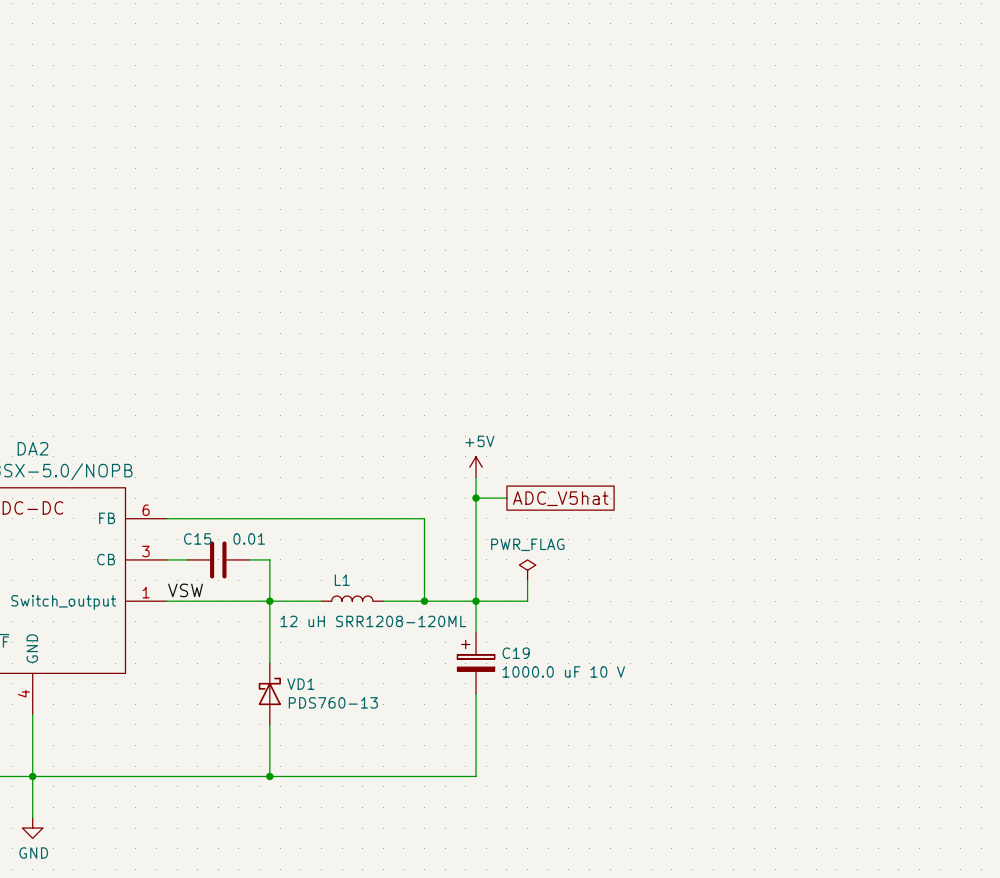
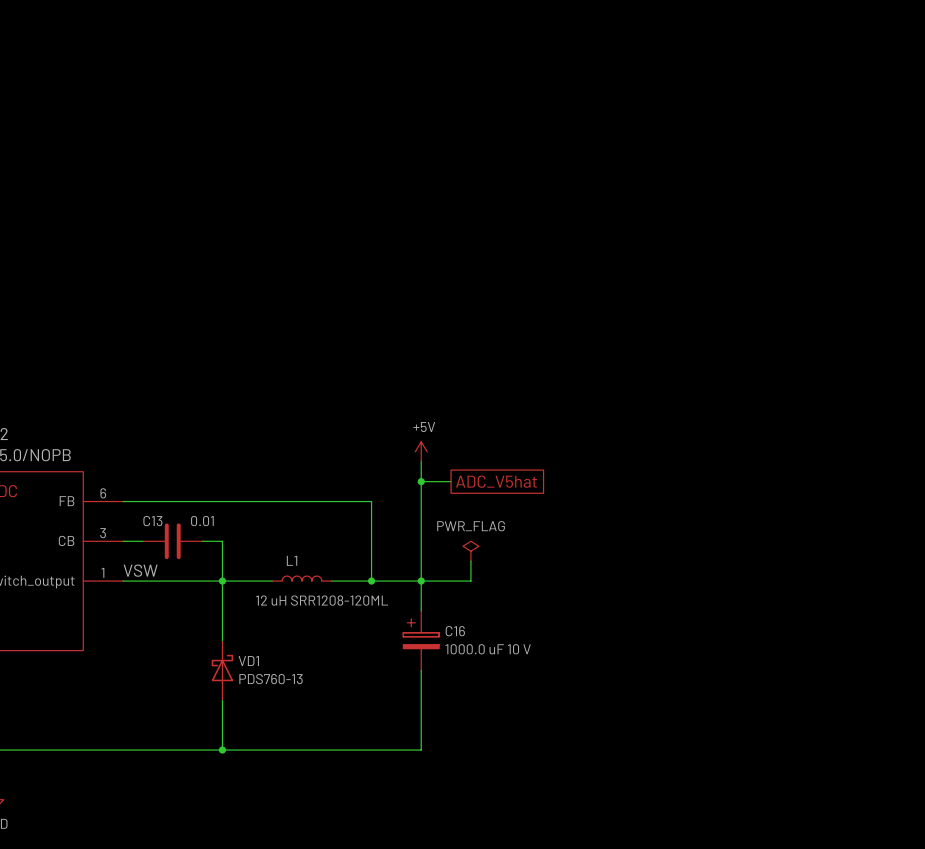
C15 name: C15 (197, 538) -> C13 (152, 521)
C19 name: C19 (516, 653) -> C16 (455, 631)

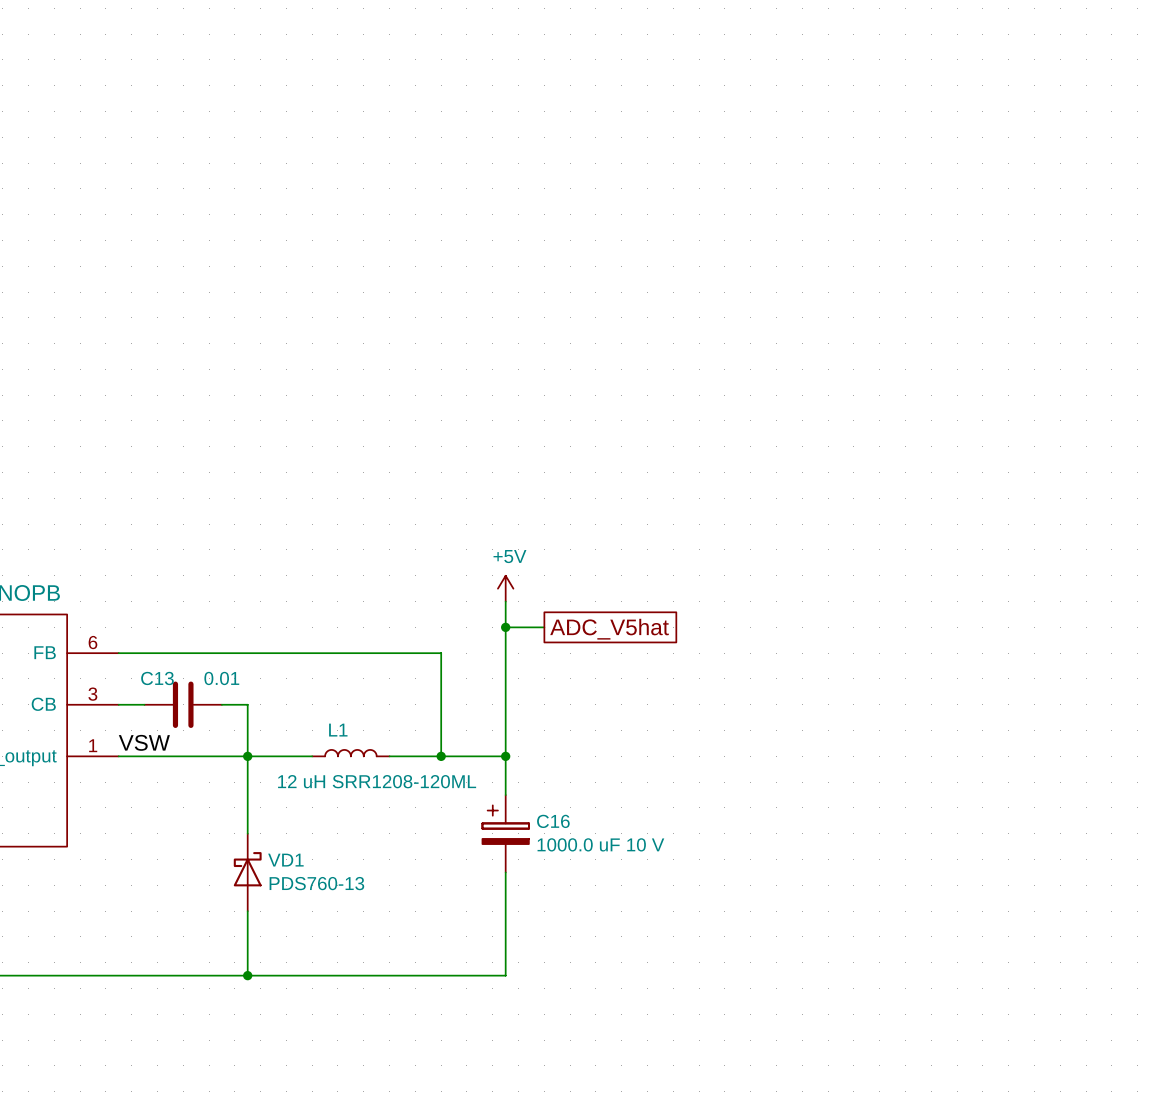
power symbol: PWR_FLAG (470, 551) -> none
wire: (470, 561) (470, 581) (421, 581) -> none

